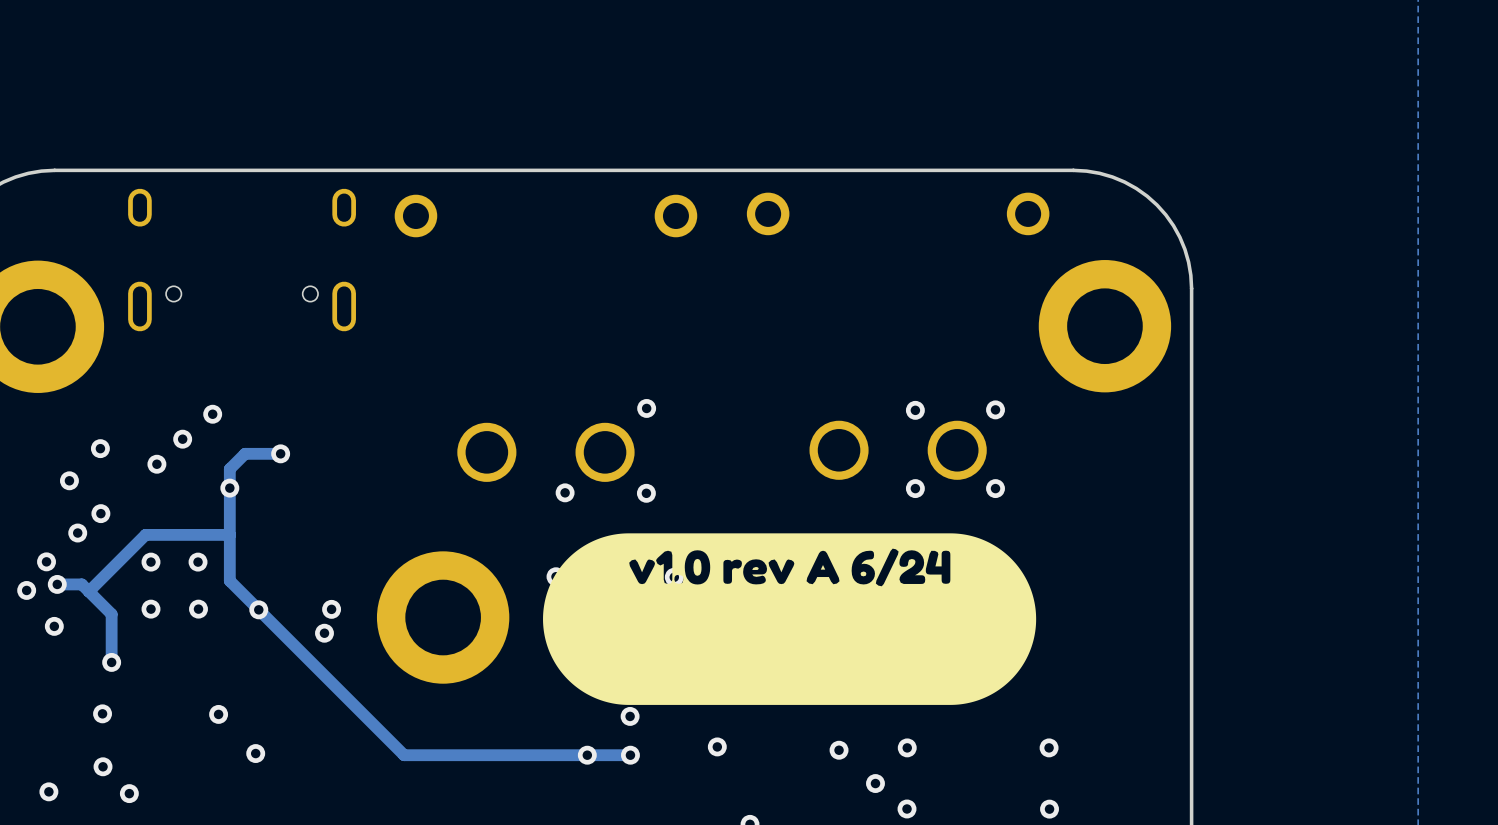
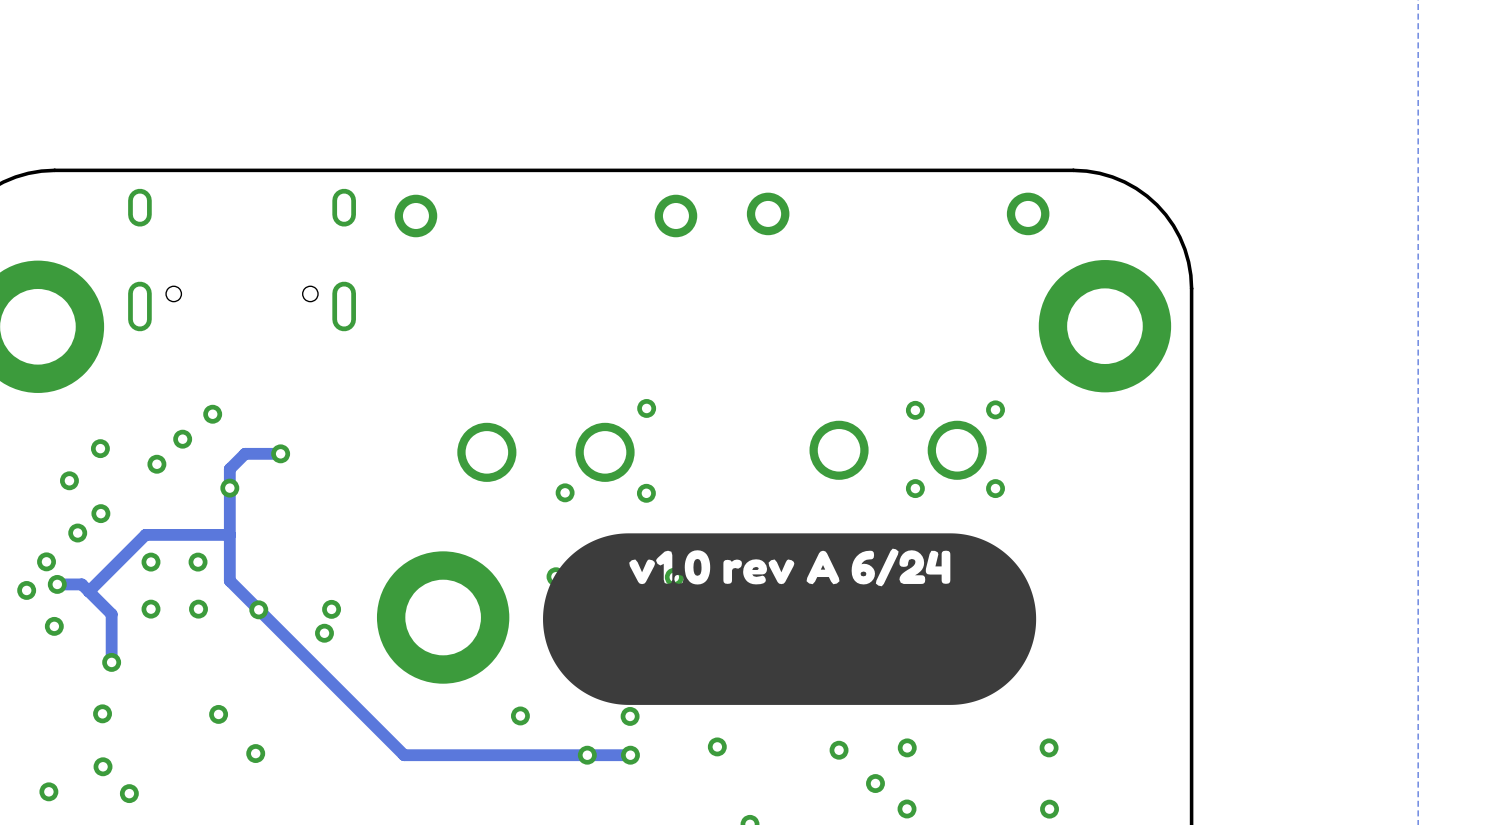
via: none -> (520, 715)

